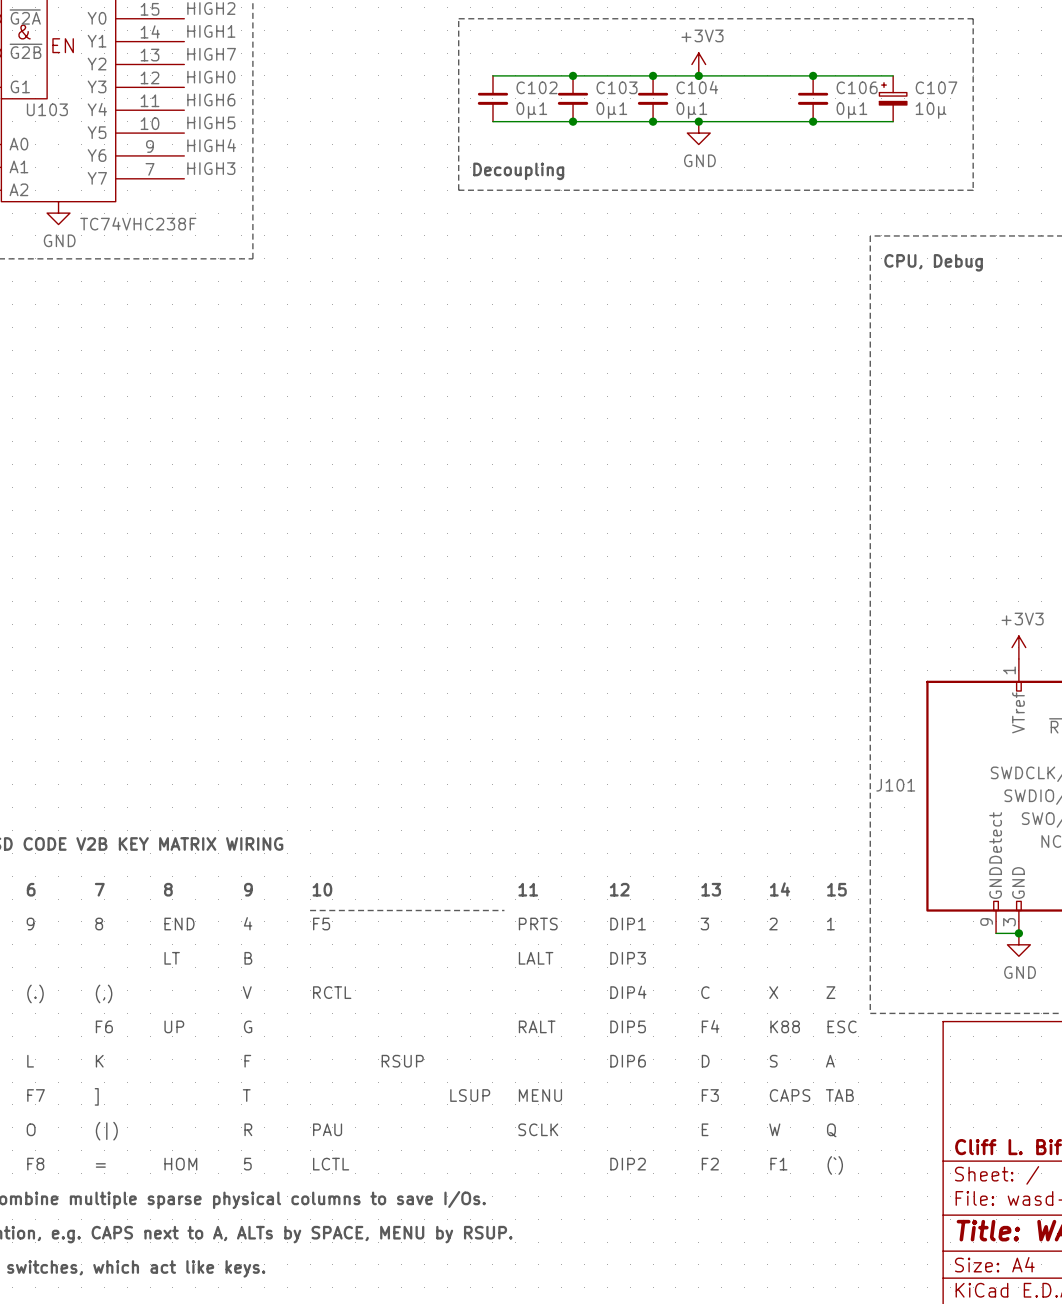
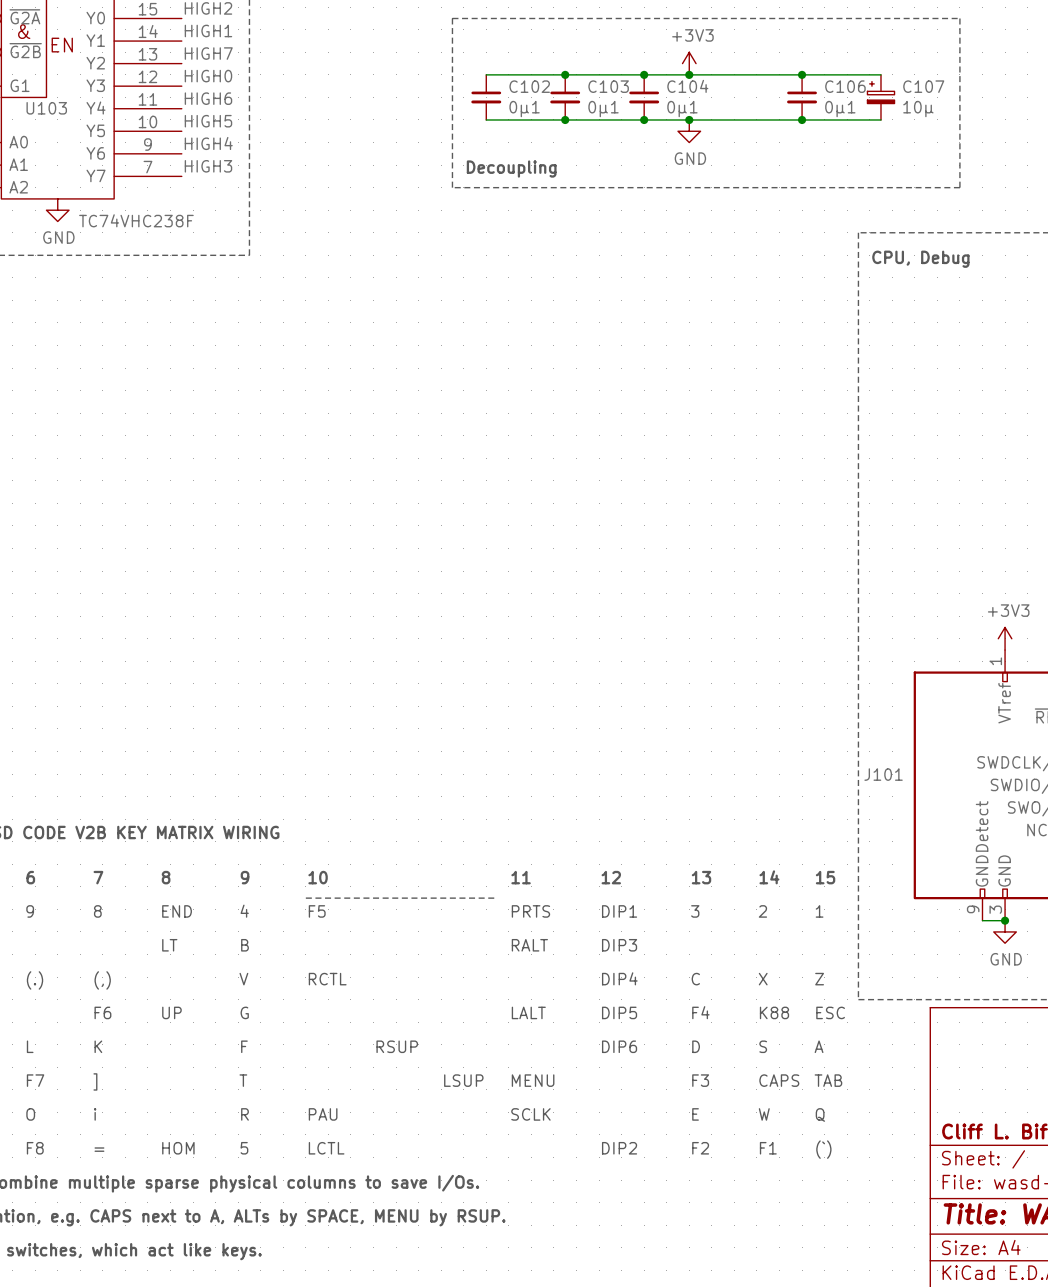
text: LALT (536, 958) -> RALT (529, 945)
text: RALT (537, 1026) -> LALT (528, 1012)
text: (|) (106, 1131) -> i (95, 1114)

